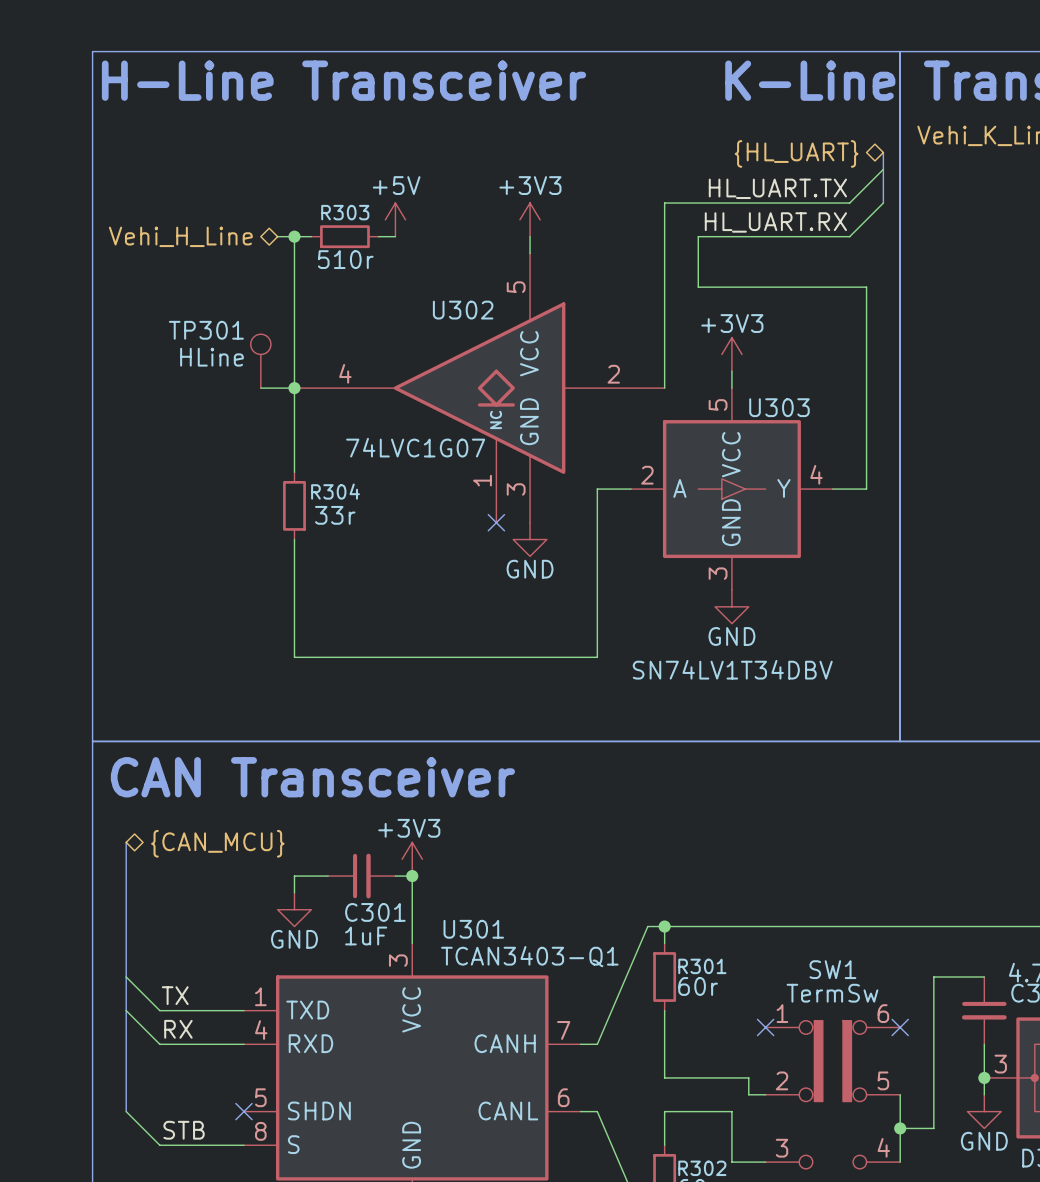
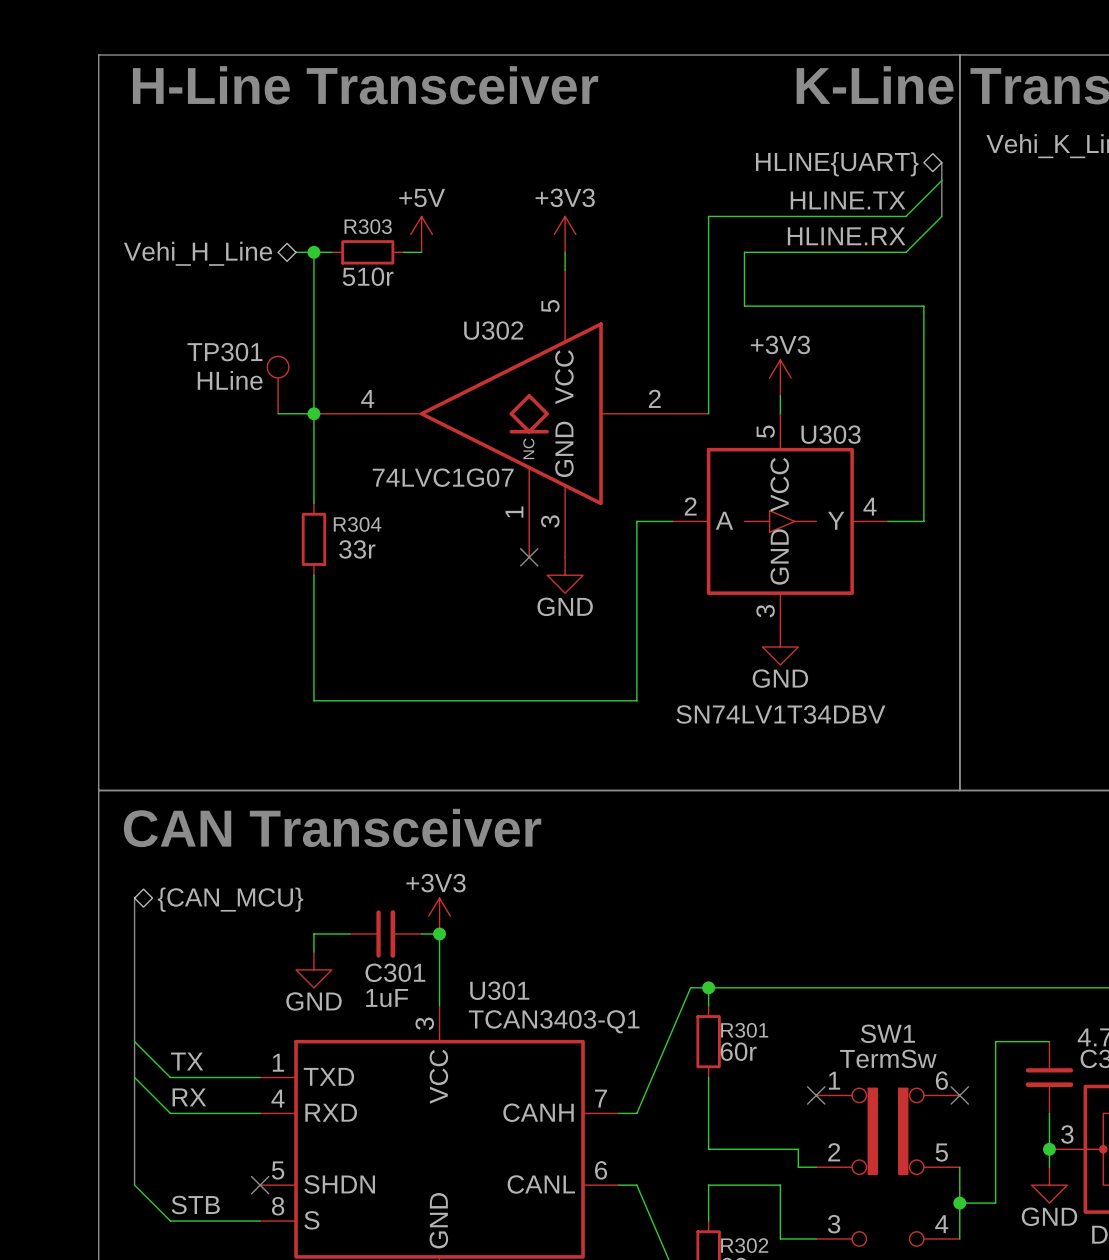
hierarchical label: {HL_UART} (796, 153) -> HLINE{UART} (837, 164)
label: HL_UART.TX (777, 188) -> HLINE.TX (848, 200)
label: HL_UART.RX (775, 222) -> HLINE.RX (846, 236)

